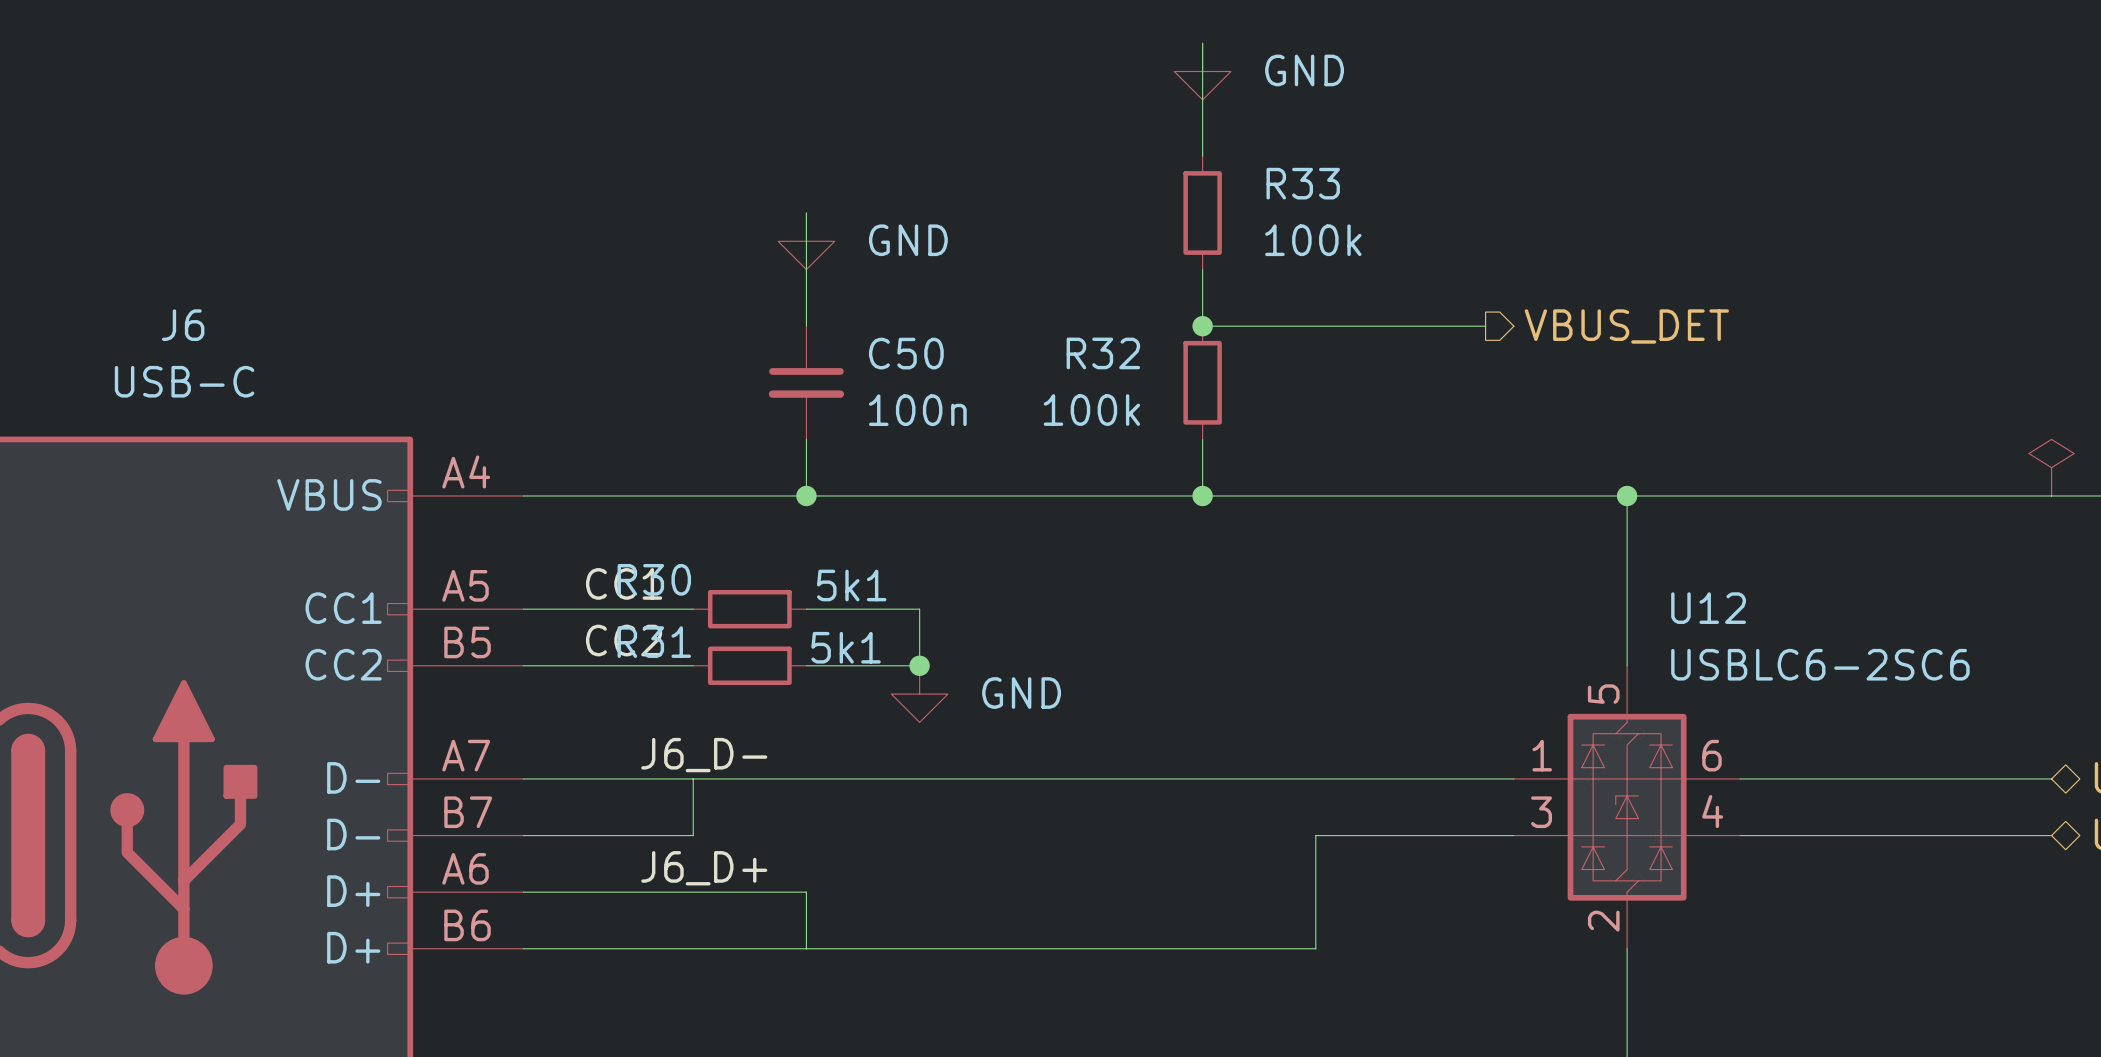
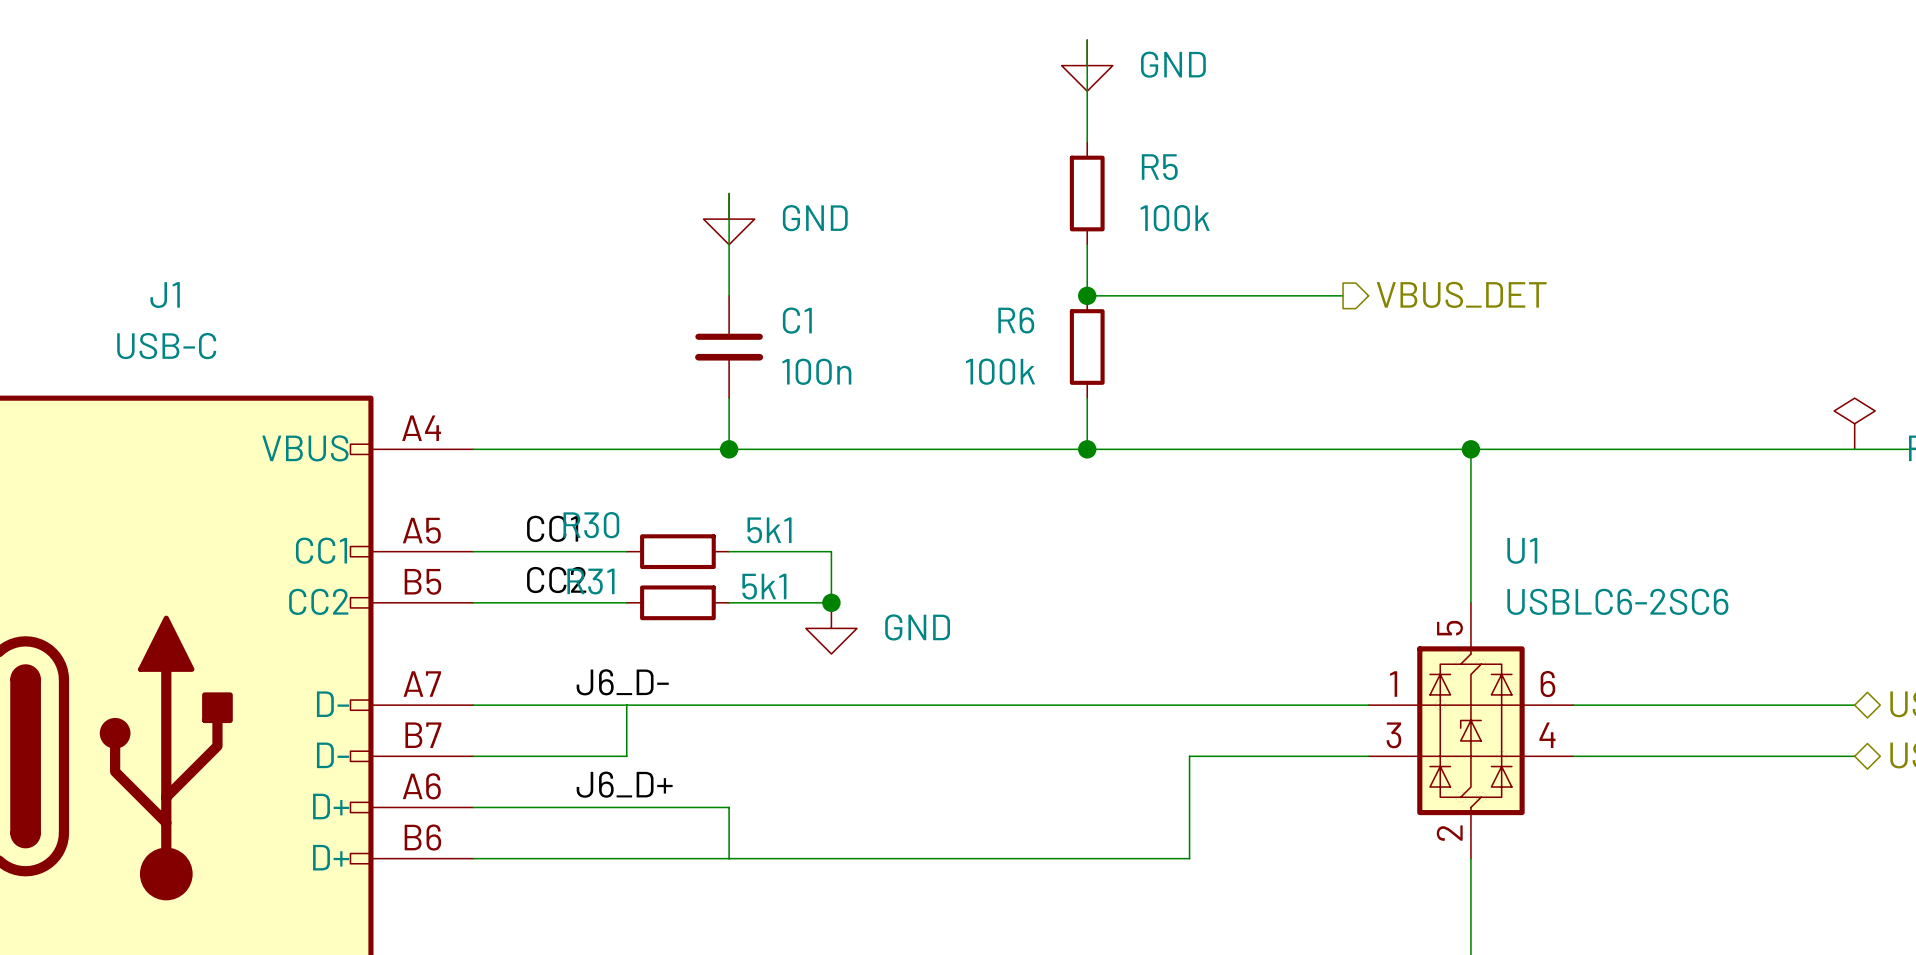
R33 name: R33 (1303, 183) -> R5 (1159, 167)
J6 name: J6 (183, 325) -> J1 (165, 295)
C50 name: C50 (906, 353) -> C1 (797, 320)
R32 name: R32 (1103, 353) -> R6 (1016, 320)
U12 name: U12 (1708, 608) -> U1 (1522, 550)

